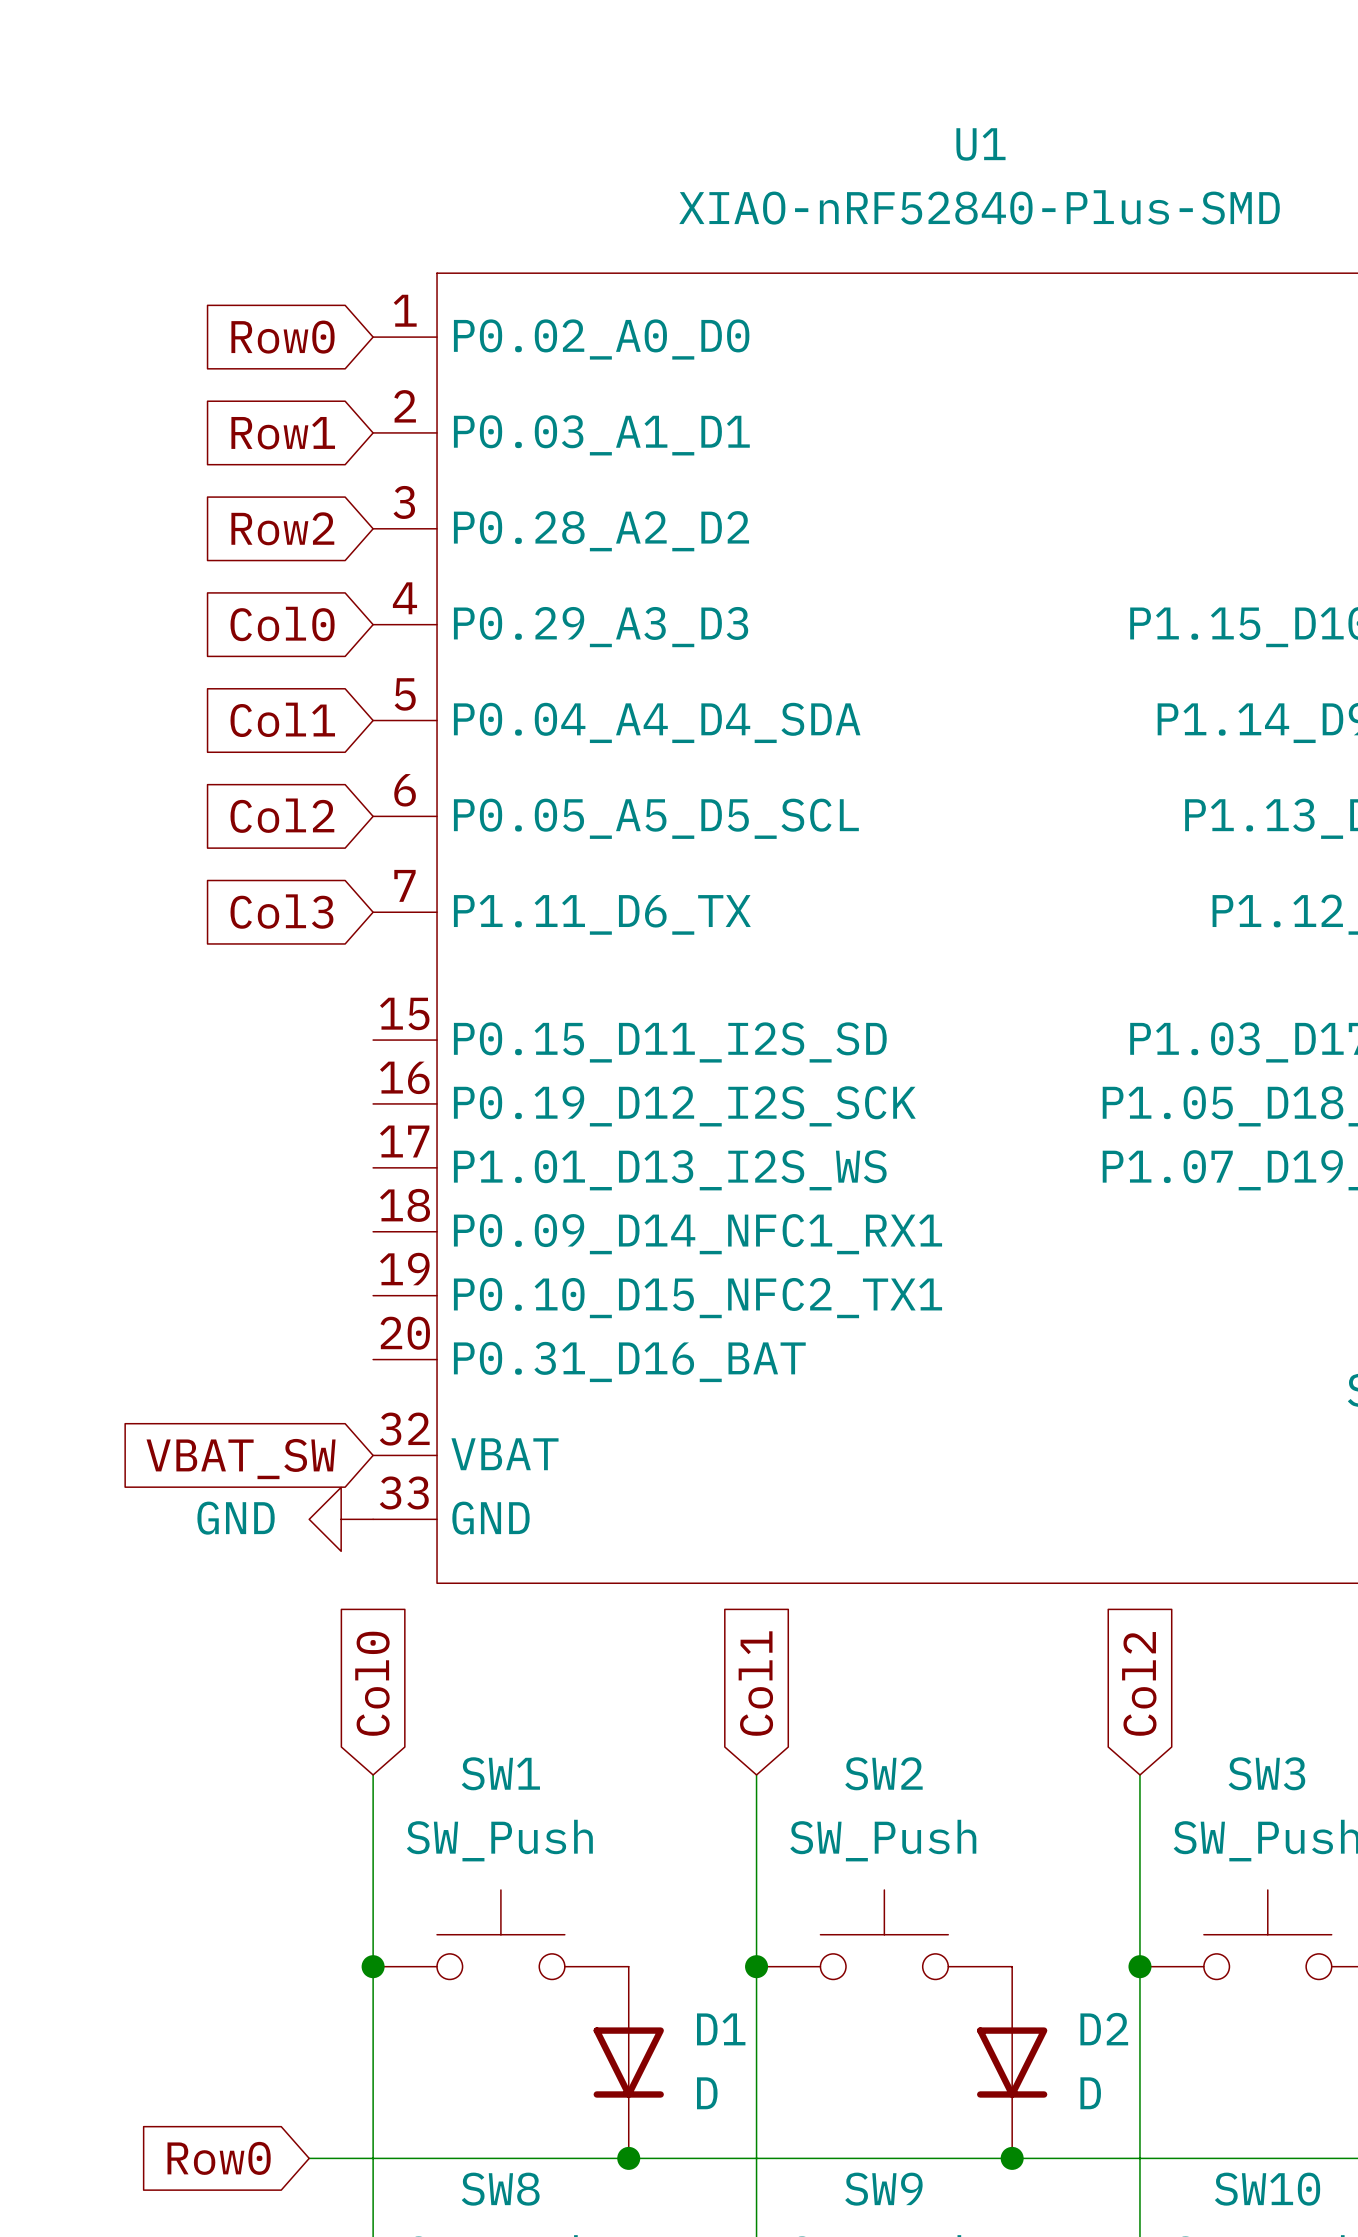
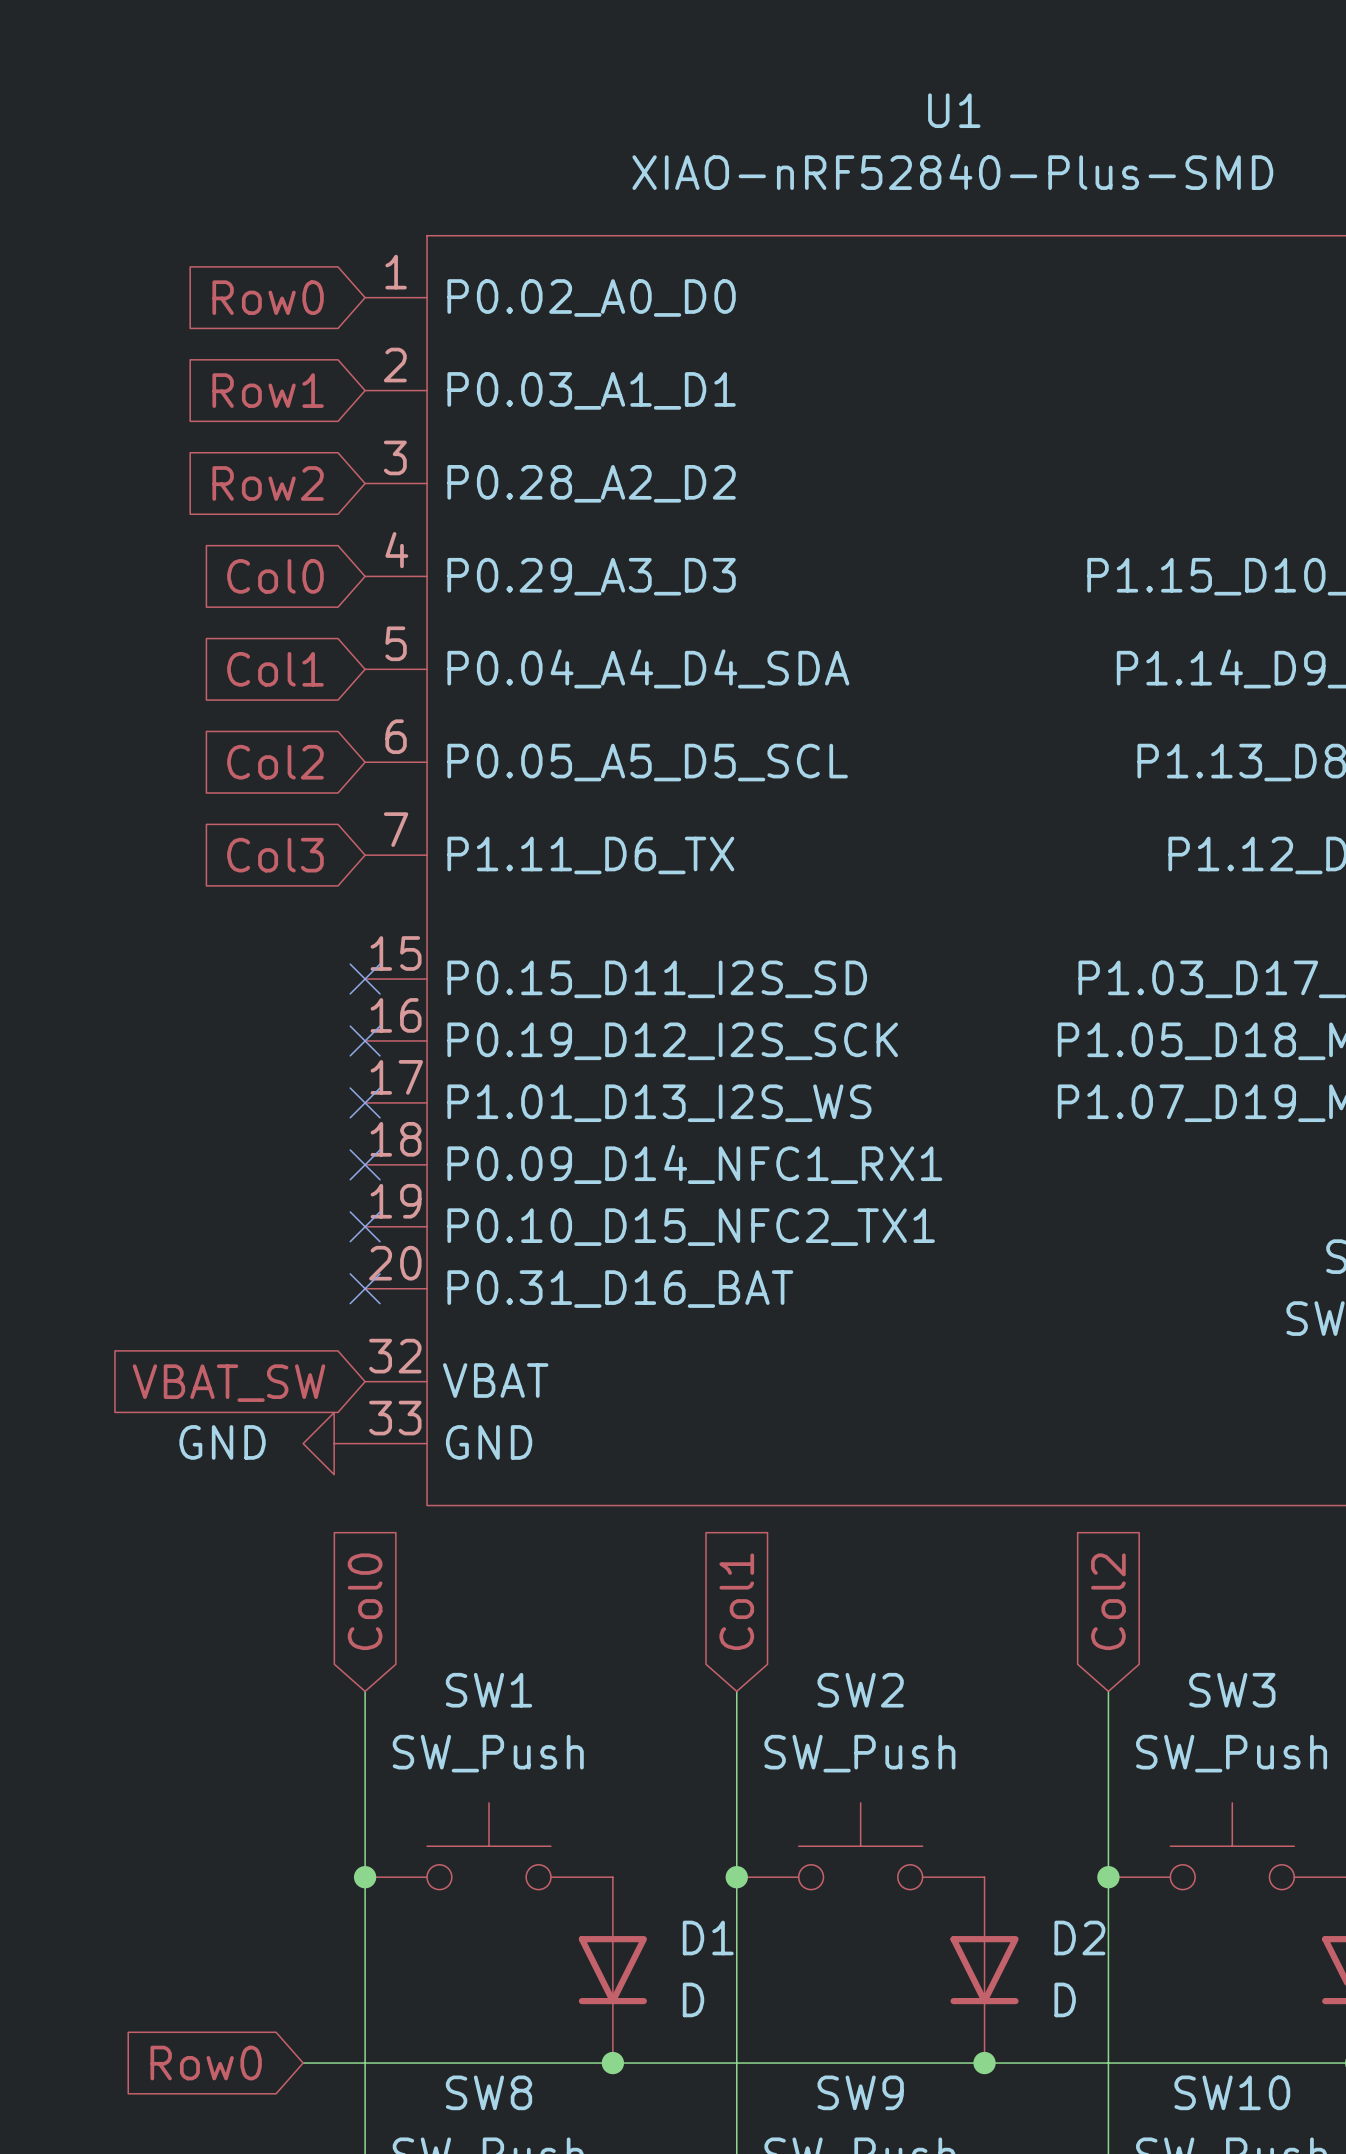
no-connect mark: none -> (365, 979)
no-connect mark: none -> (365, 1040)
no-connect mark: none -> (365, 1102)
no-connect mark: none -> (365, 1164)
no-connect mark: none -> (365, 1226)
no-connect mark: none -> (365, 1288)

